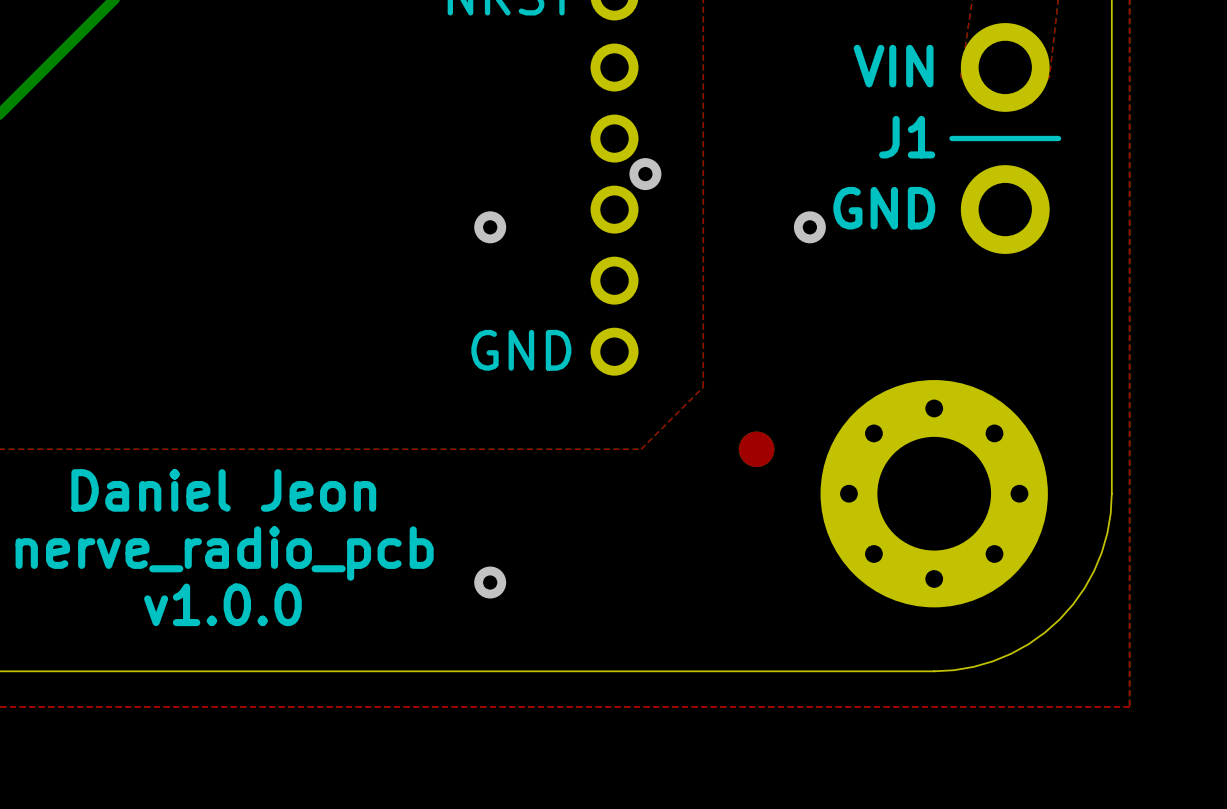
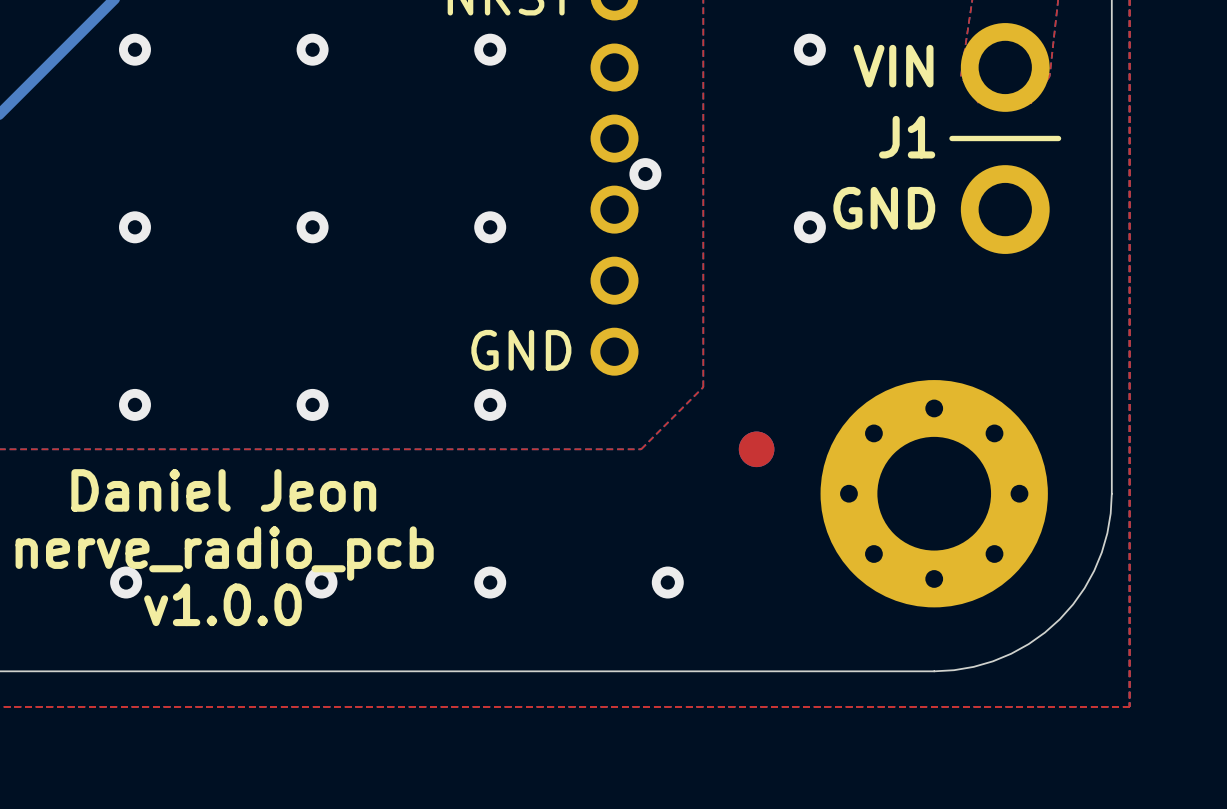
via: none -> (134, 49)
via: none -> (312, 49)
via: none -> (490, 49)
via: none -> (809, 49)
via: none -> (134, 227)
via: none -> (312, 227)
via: none -> (134, 404)
via: none -> (312, 404)
via: none -> (490, 404)
via: none -> (126, 582)
via: none -> (321, 582)
via: none -> (667, 582)

